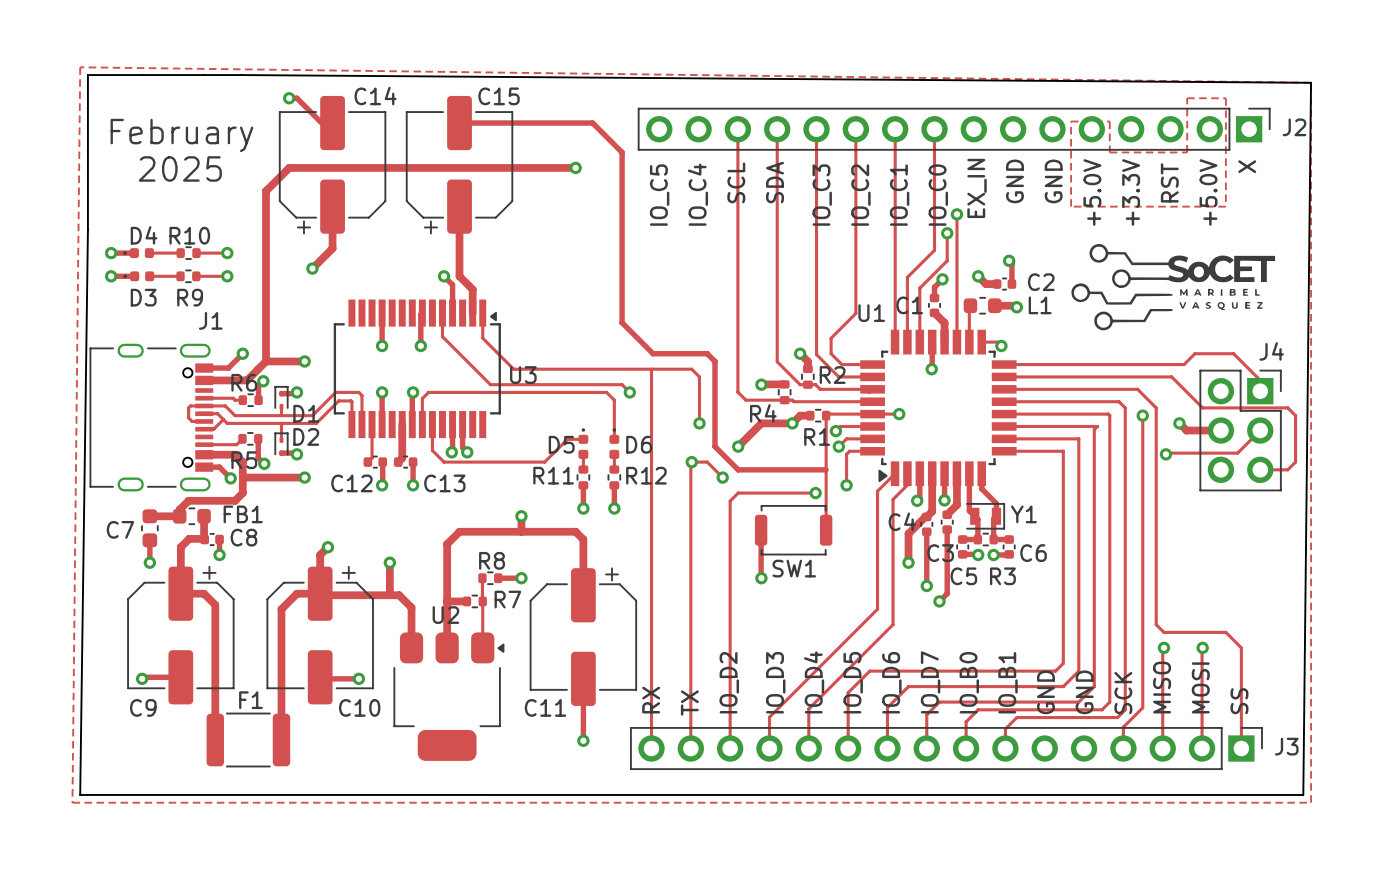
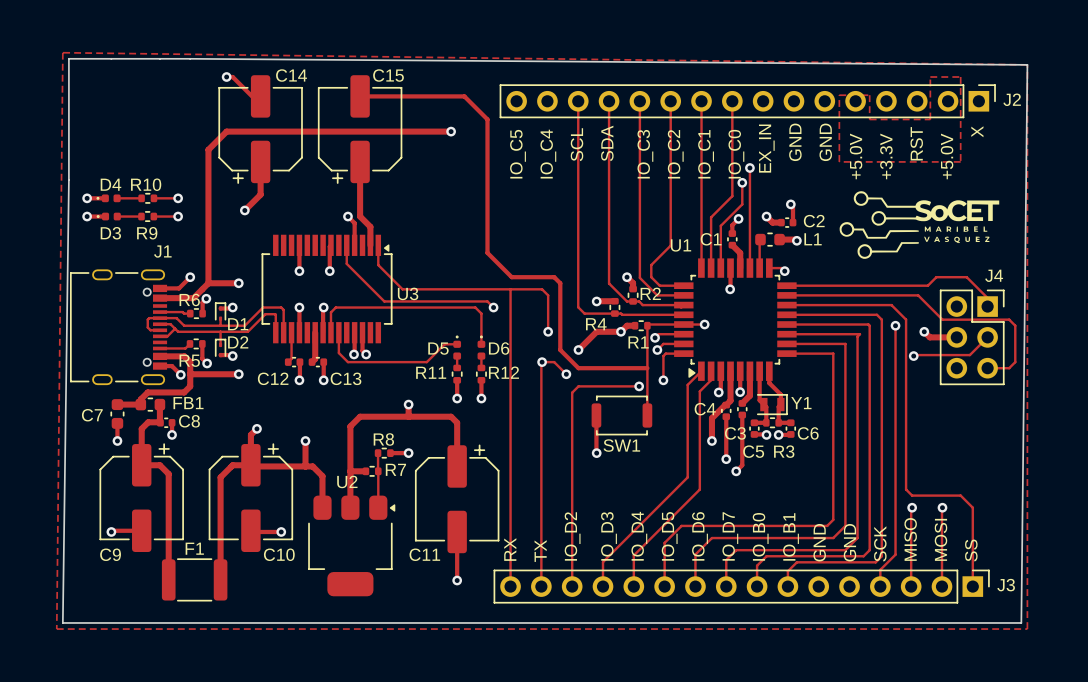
text: February (181, 135) -> none
text: 2025 (180, 168) -> none

